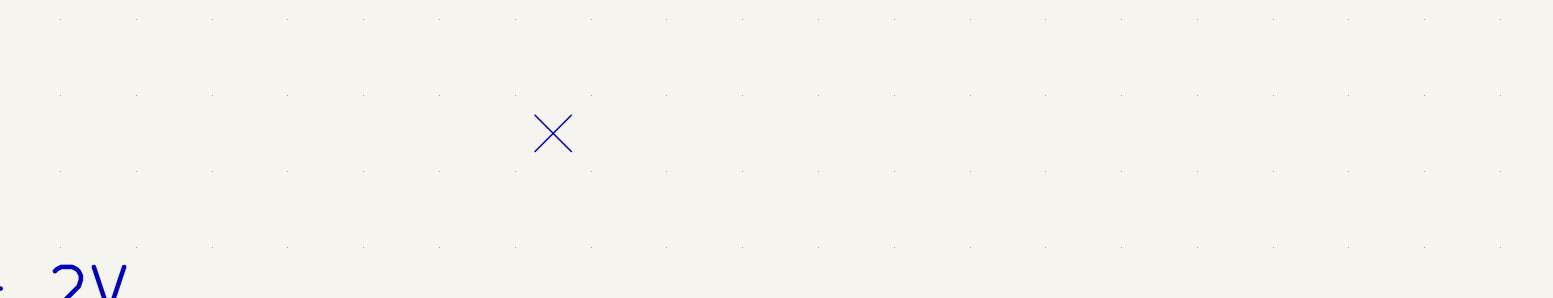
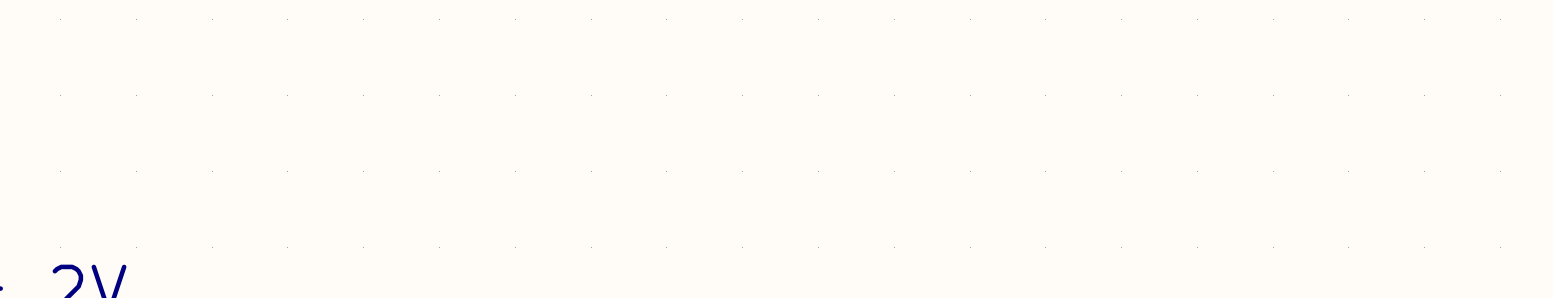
no-connect mark: (553, 133) -> none

